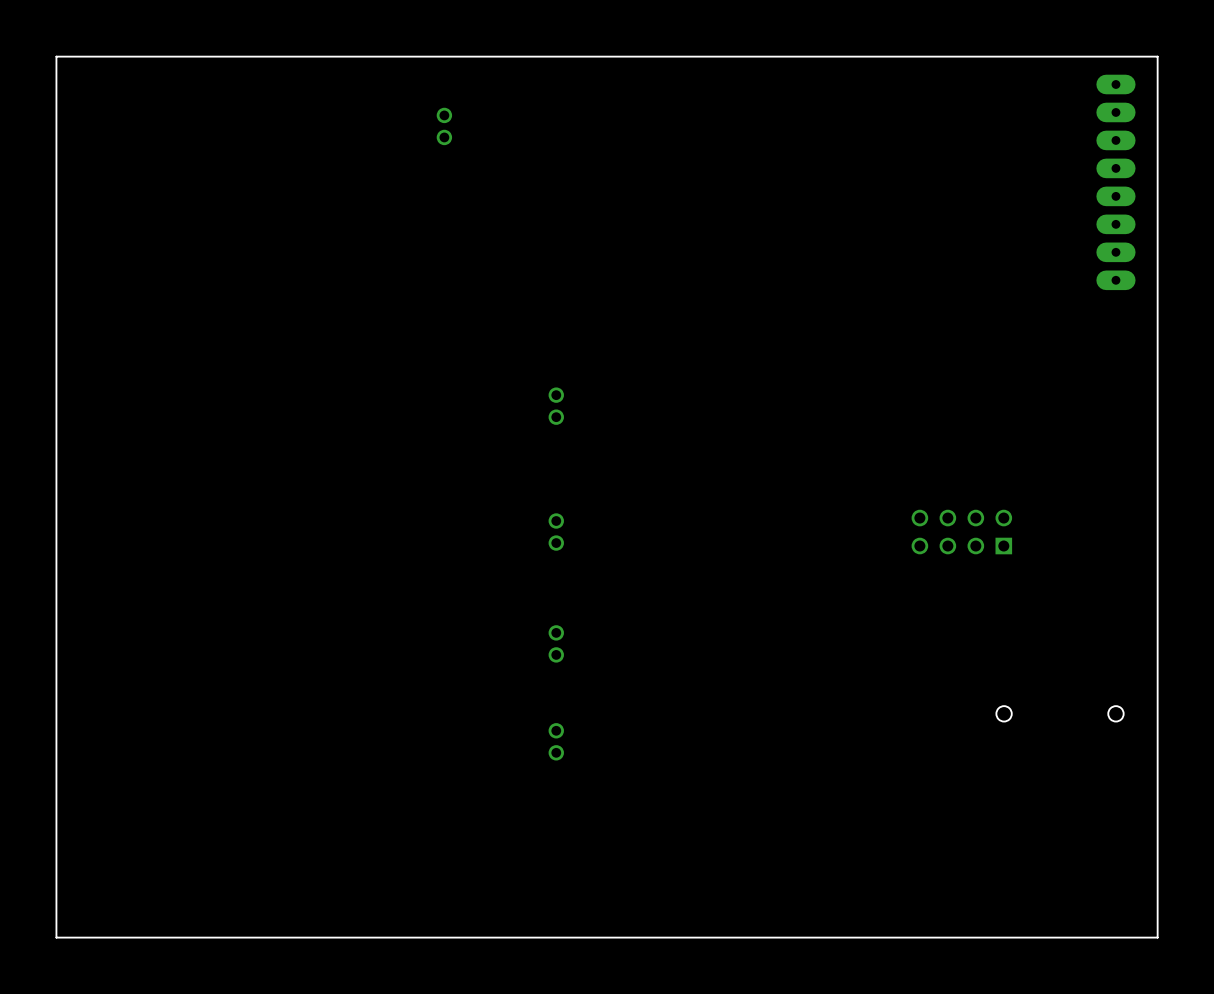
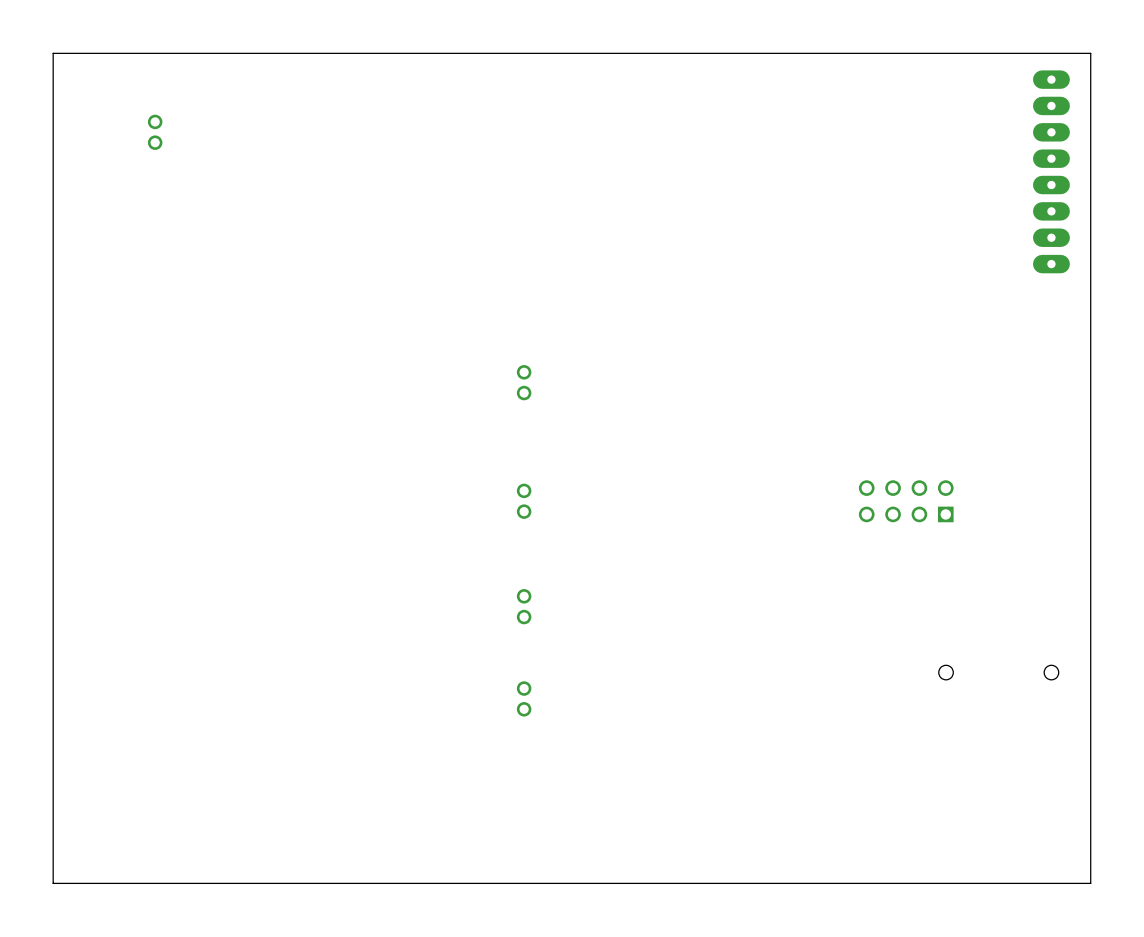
part: (444, 126) -> none
part: none -> (155, 132)

